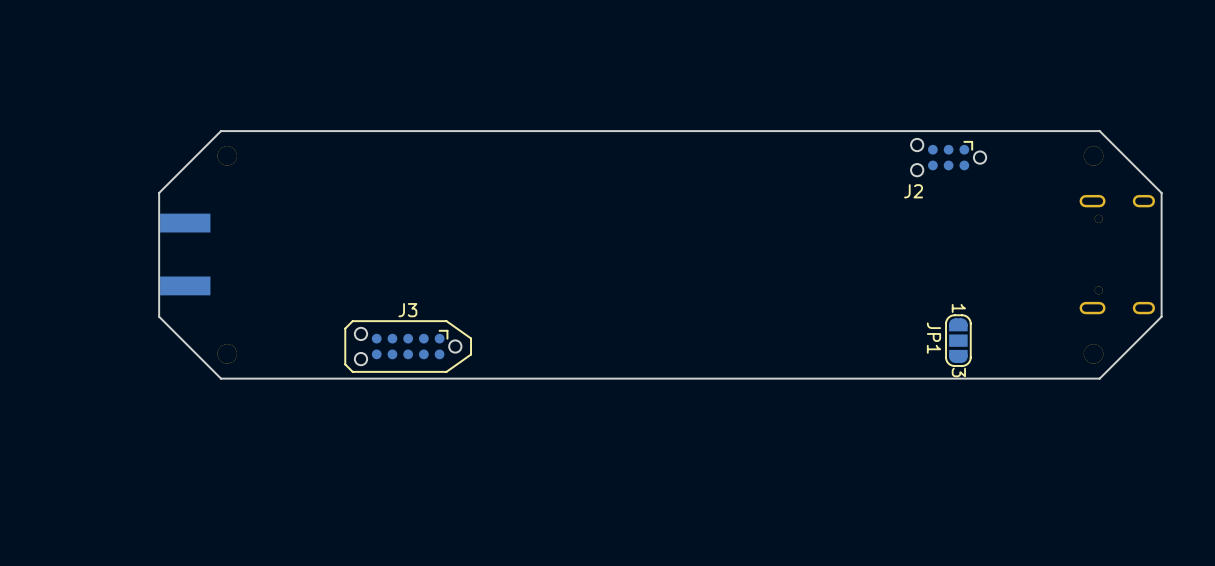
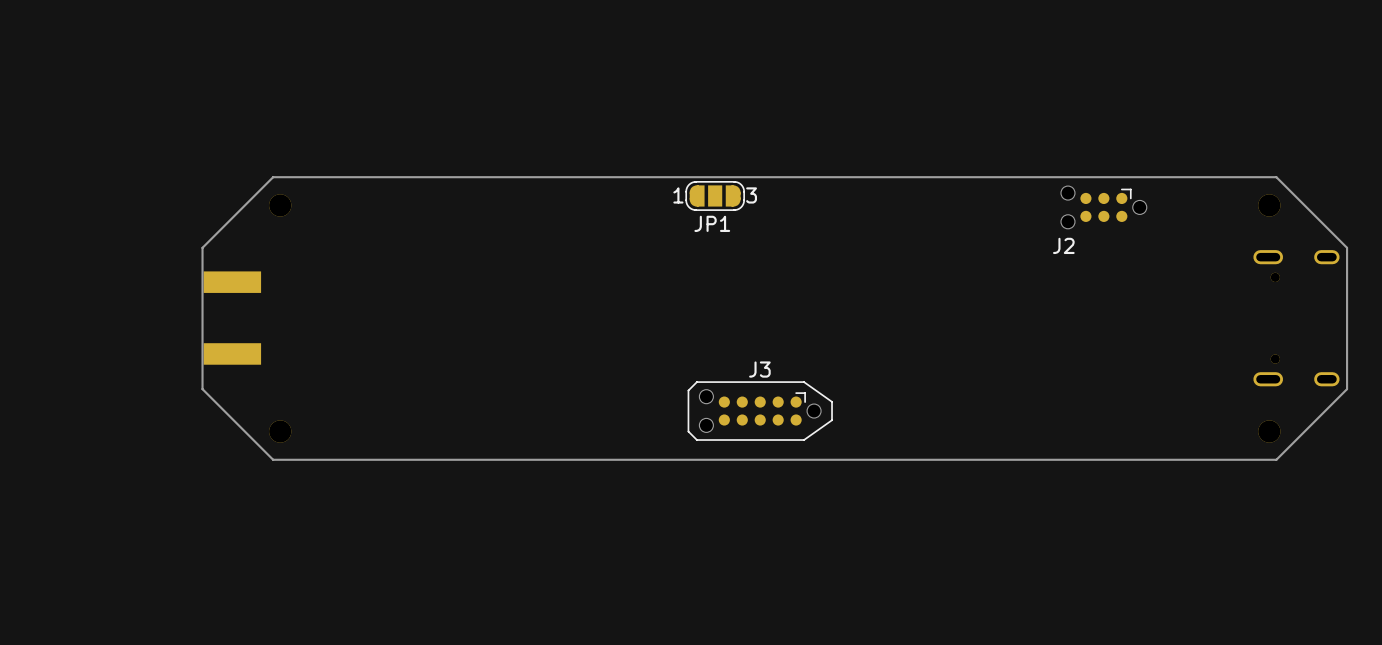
JP1 rotation: 0° (958, 340) -> 90° counterclockwise (715, 195)
JP1 position: (958, 340) -> (715, 195)
J3 position: (408, 346) -> (760, 411)

